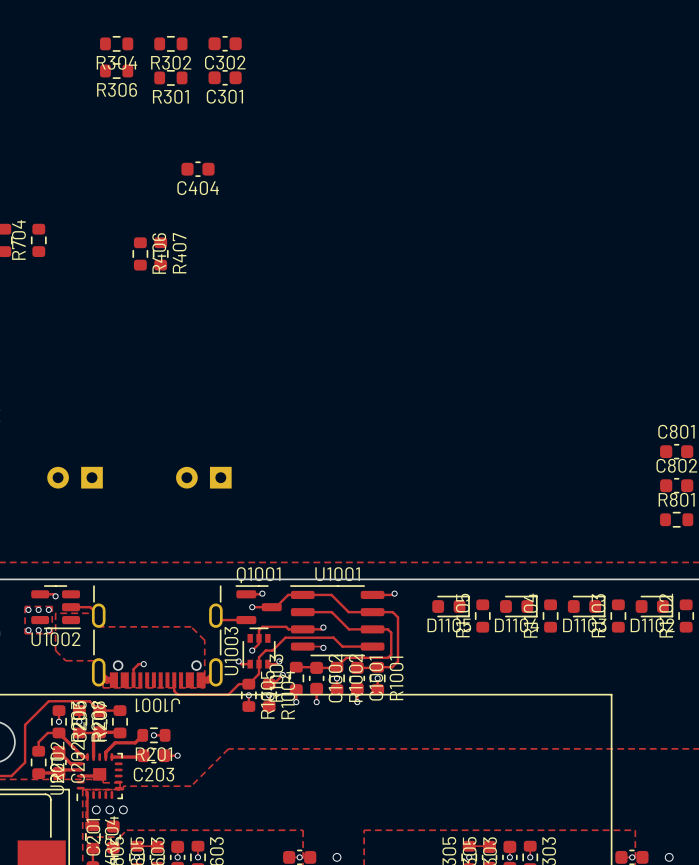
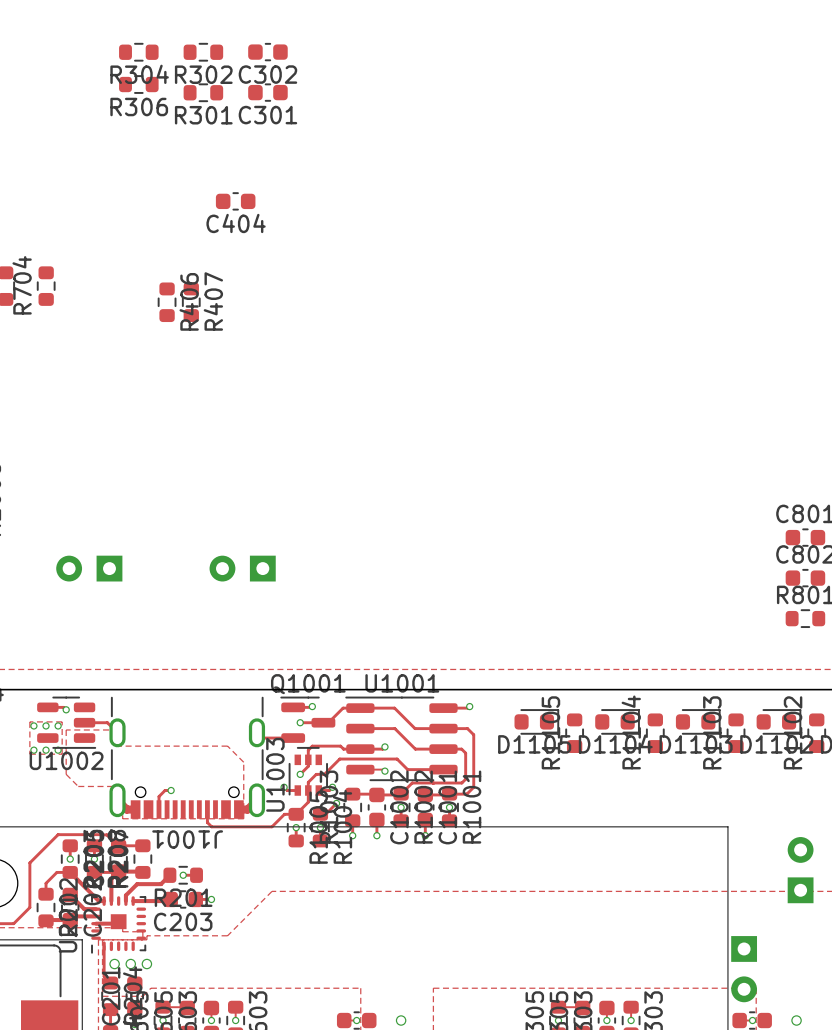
part: none -> (800, 870)
part: none -> (744, 969)

